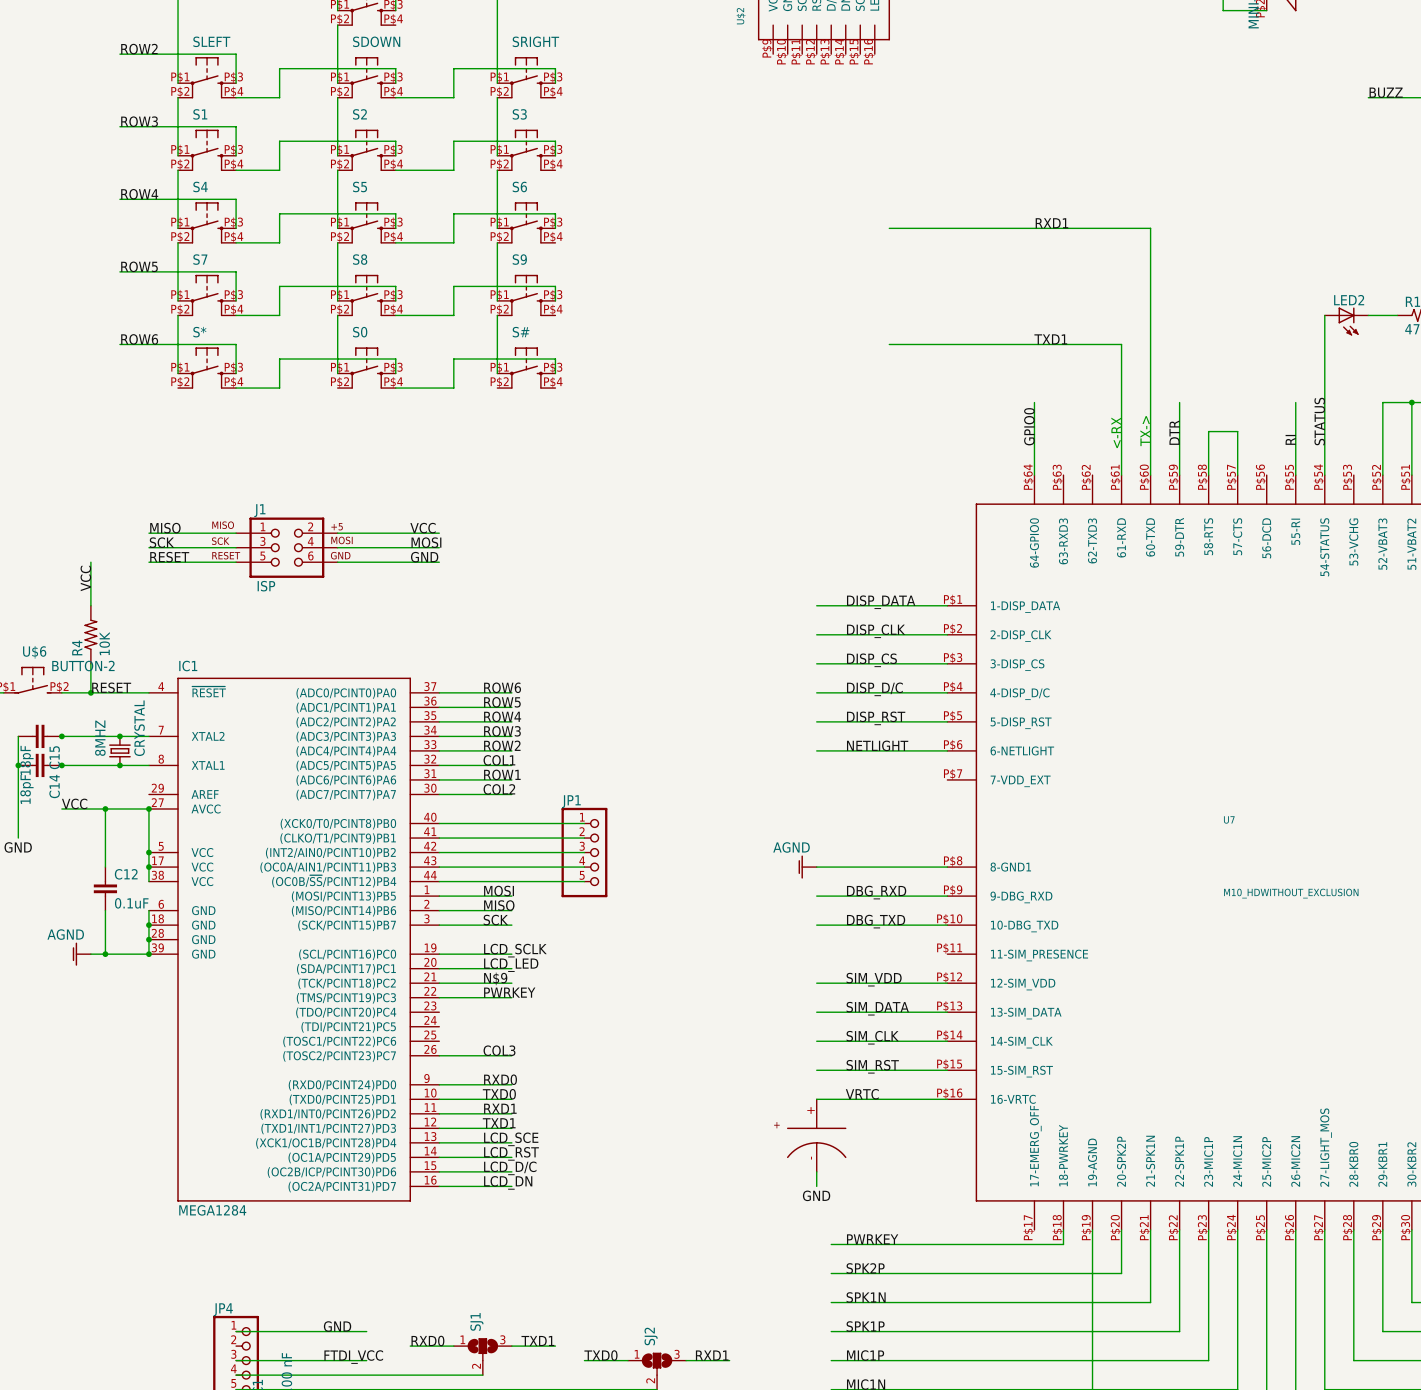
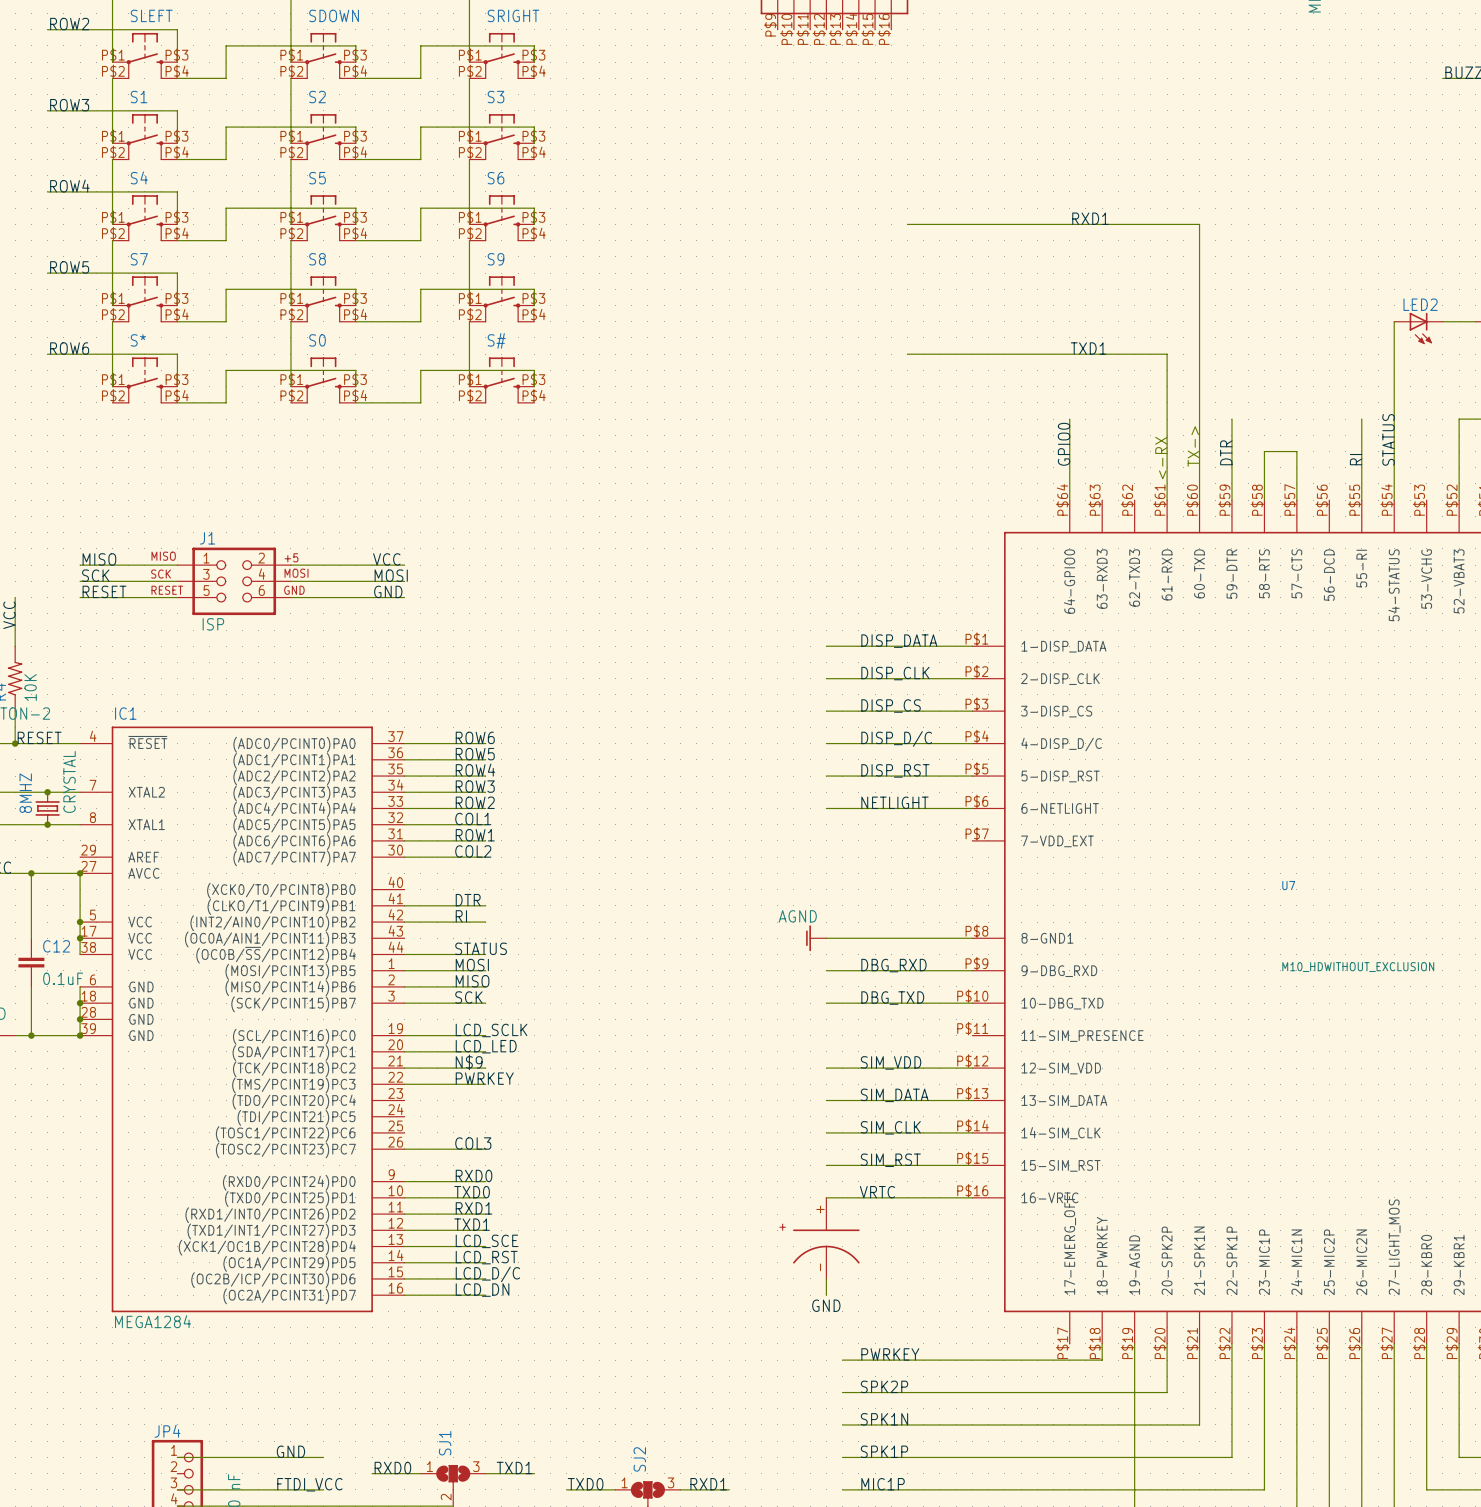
wire: (439, 823) (584, 823) -> none
label: none -> DTR (468, 900)
wire: (511, 838) (584, 838) -> none
label: none -> RI (461, 916)
wire: (511, 852) (584, 852) -> none
JP1: (584, 852) -> none
wire: (439, 867) (584, 867) -> none
label: none -> STATUS (481, 948)
wire: (511, 881) (584, 881) -> none

